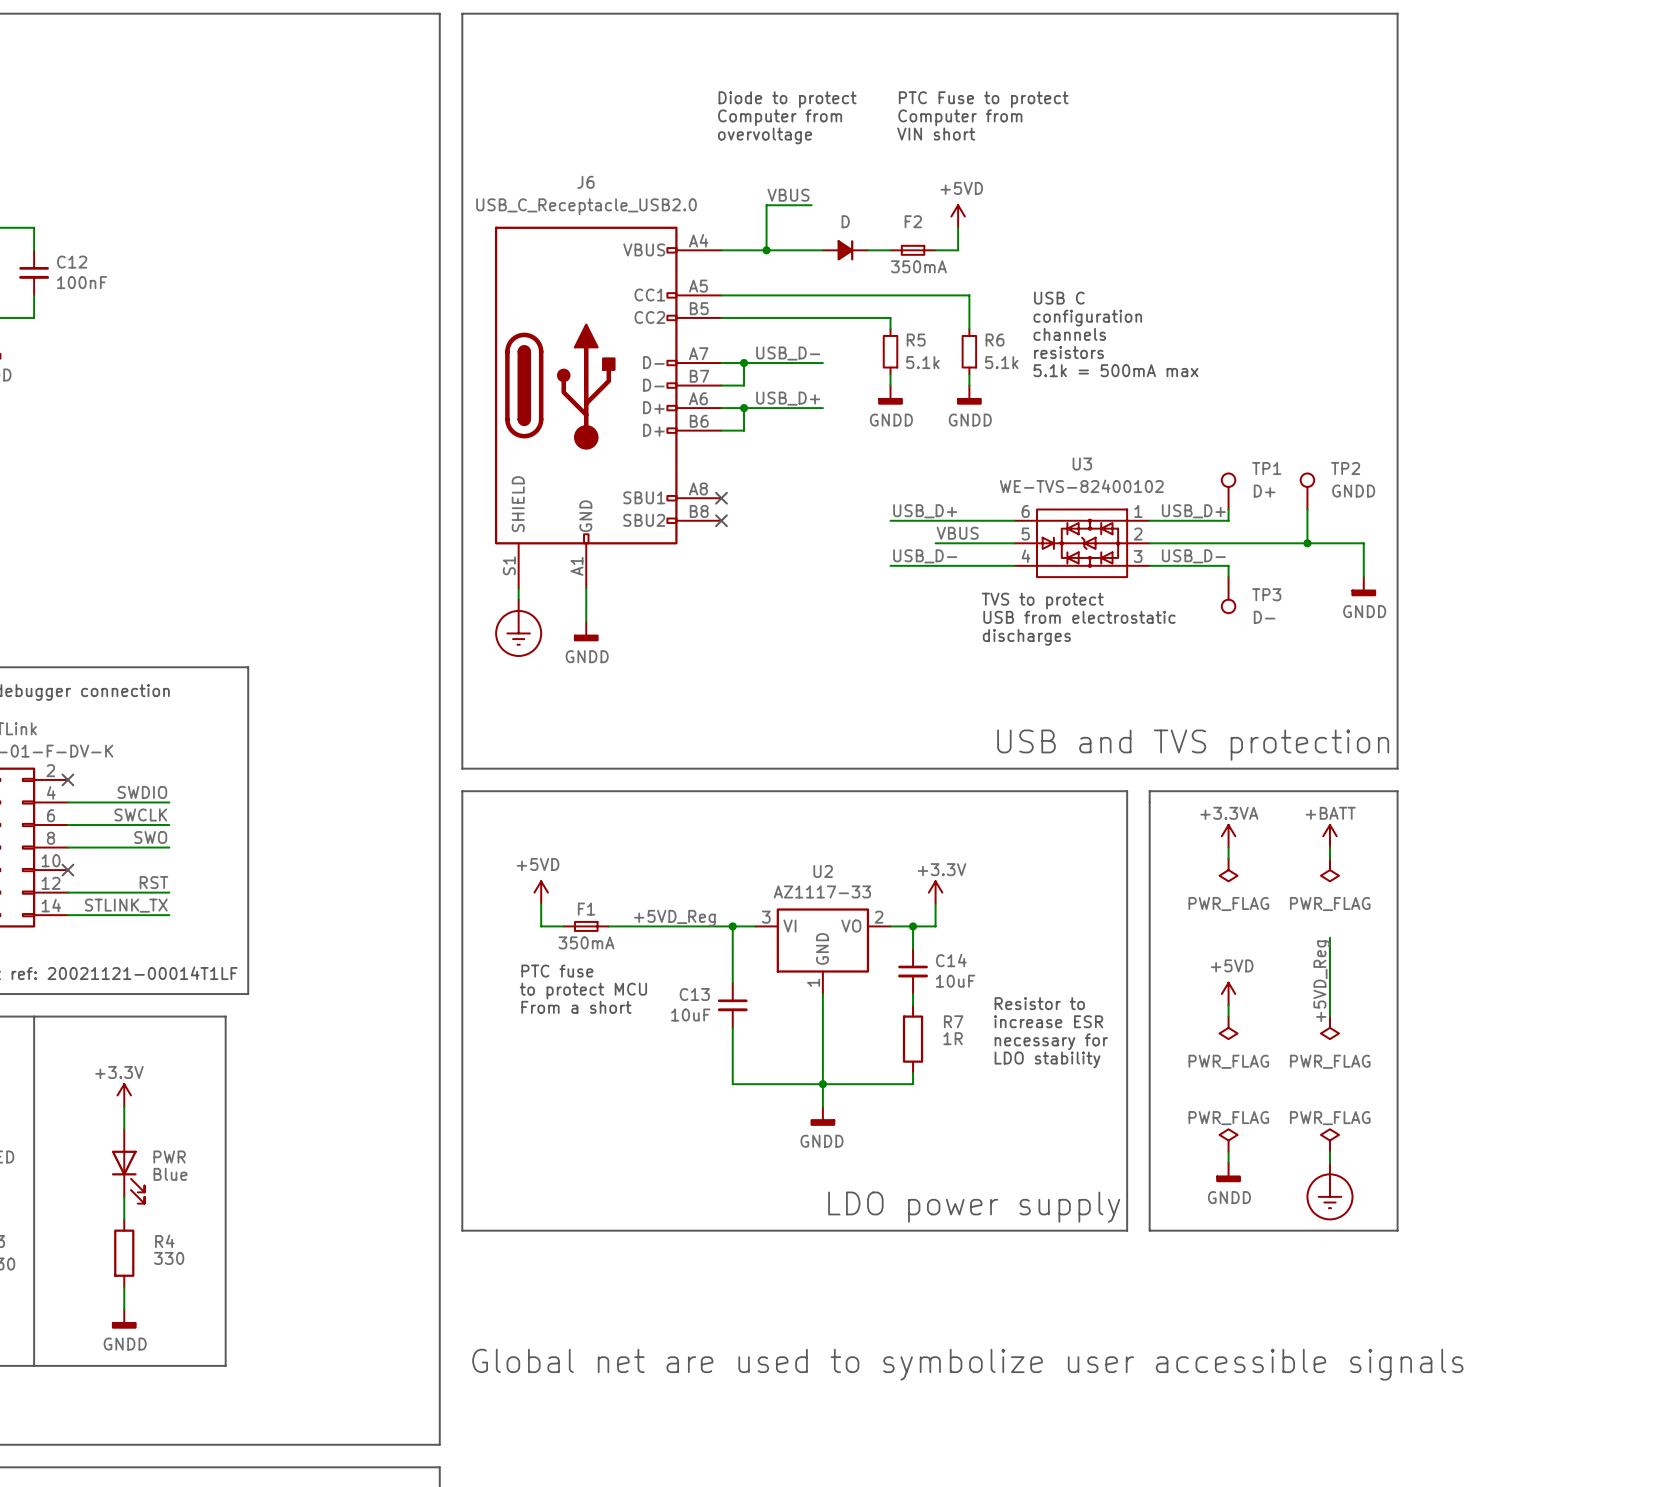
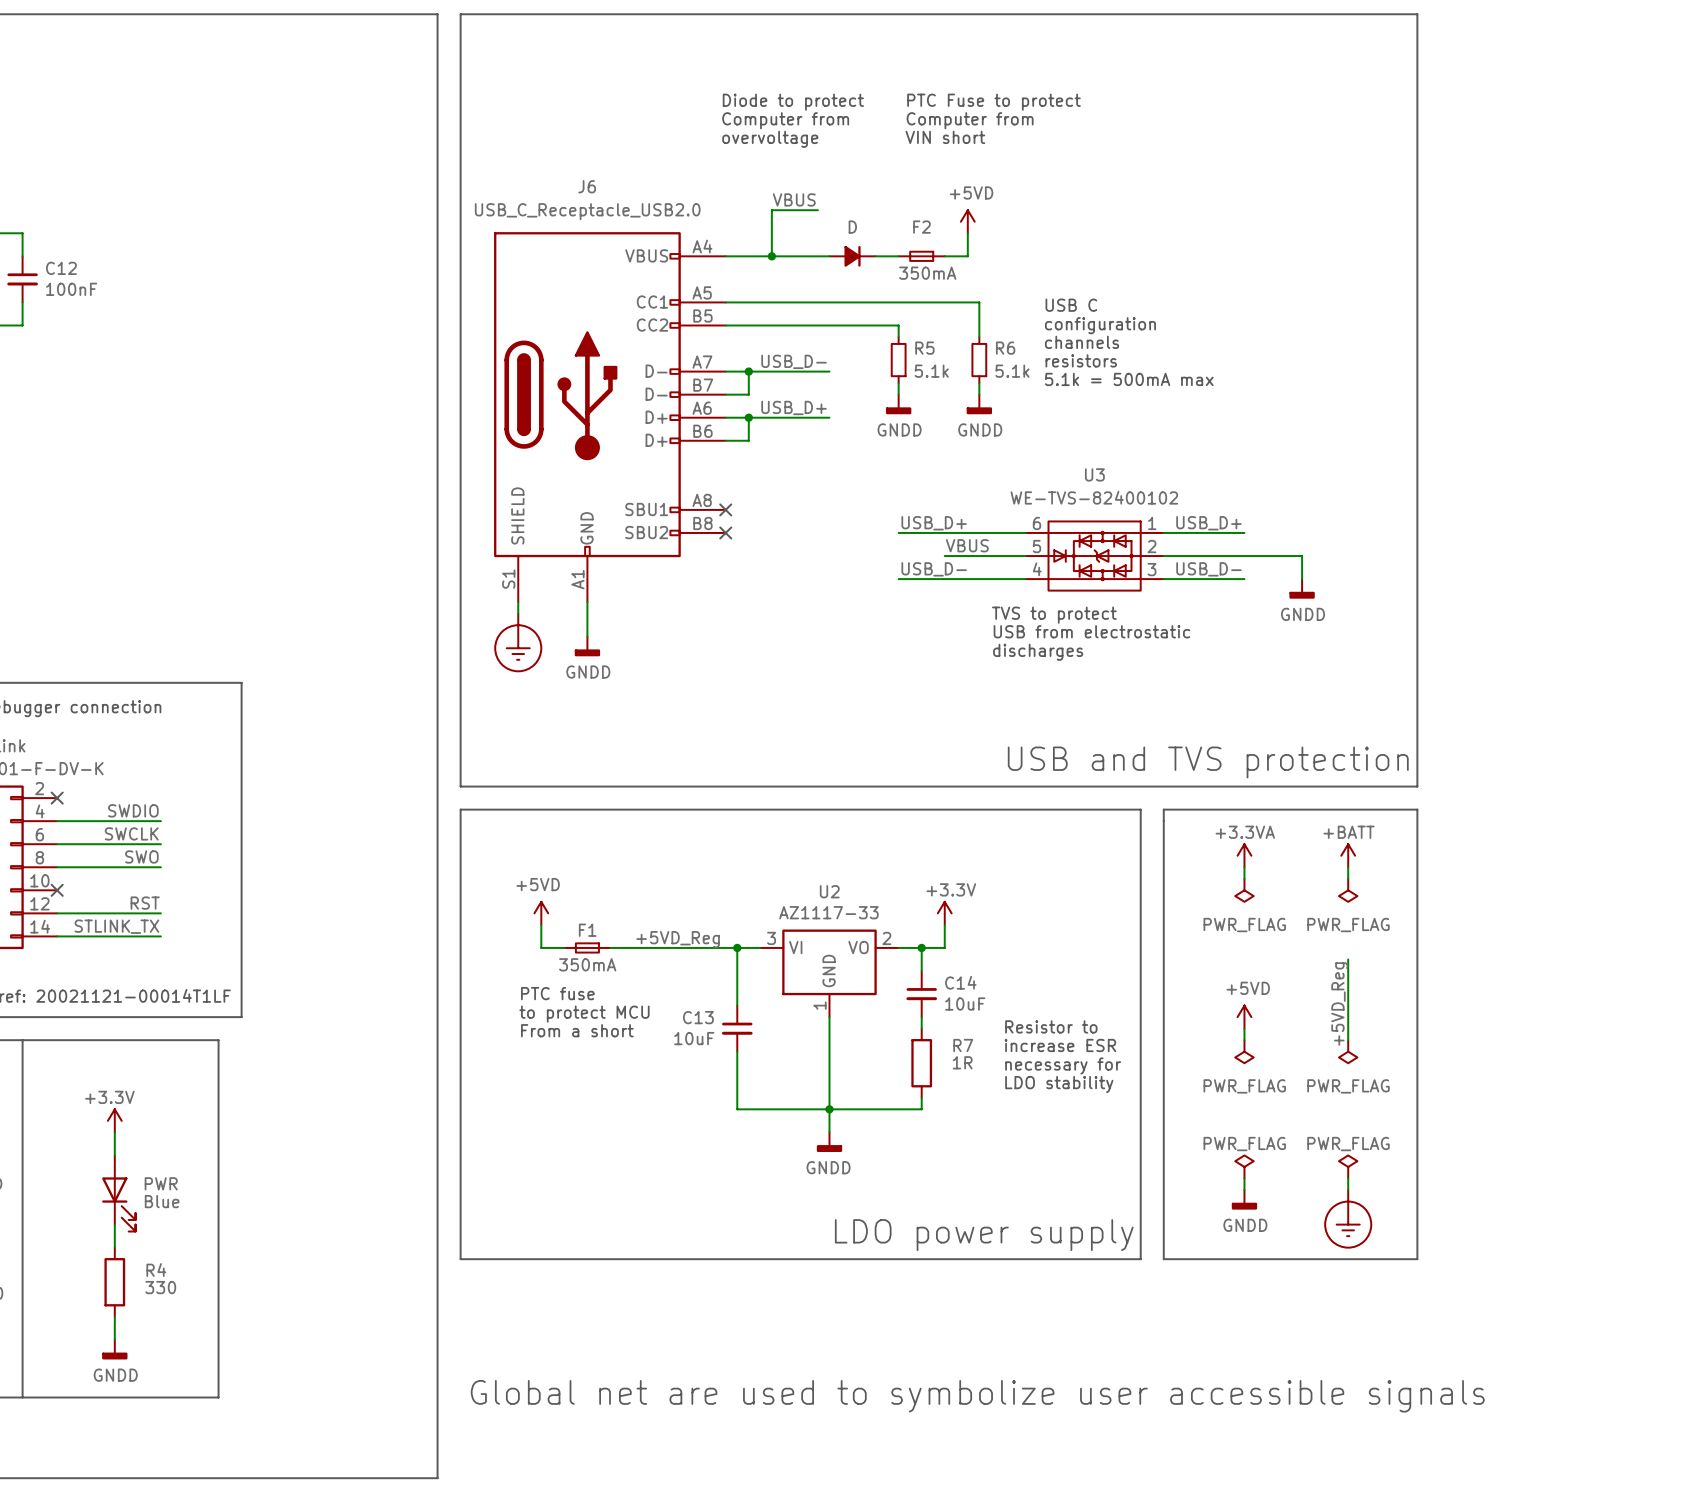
TP1: D+ (1228, 491) -> none
TP2: GNDD (1307, 491) -> none
wire: (1228, 509) (1228, 520) -> none
wire: (1307, 509) (1307, 543) -> none
wire: (1284, 543) (1363, 543) (1363, 577) -> (1302, 556) (1302, 579)
junction: (1307, 543) -> none
wire: (1228, 565) (1228, 577) -> none
power symbol position: GNDD (1363, 586) -> GNDD (1302, 588)
TP3: D- (1228, 595) -> none

